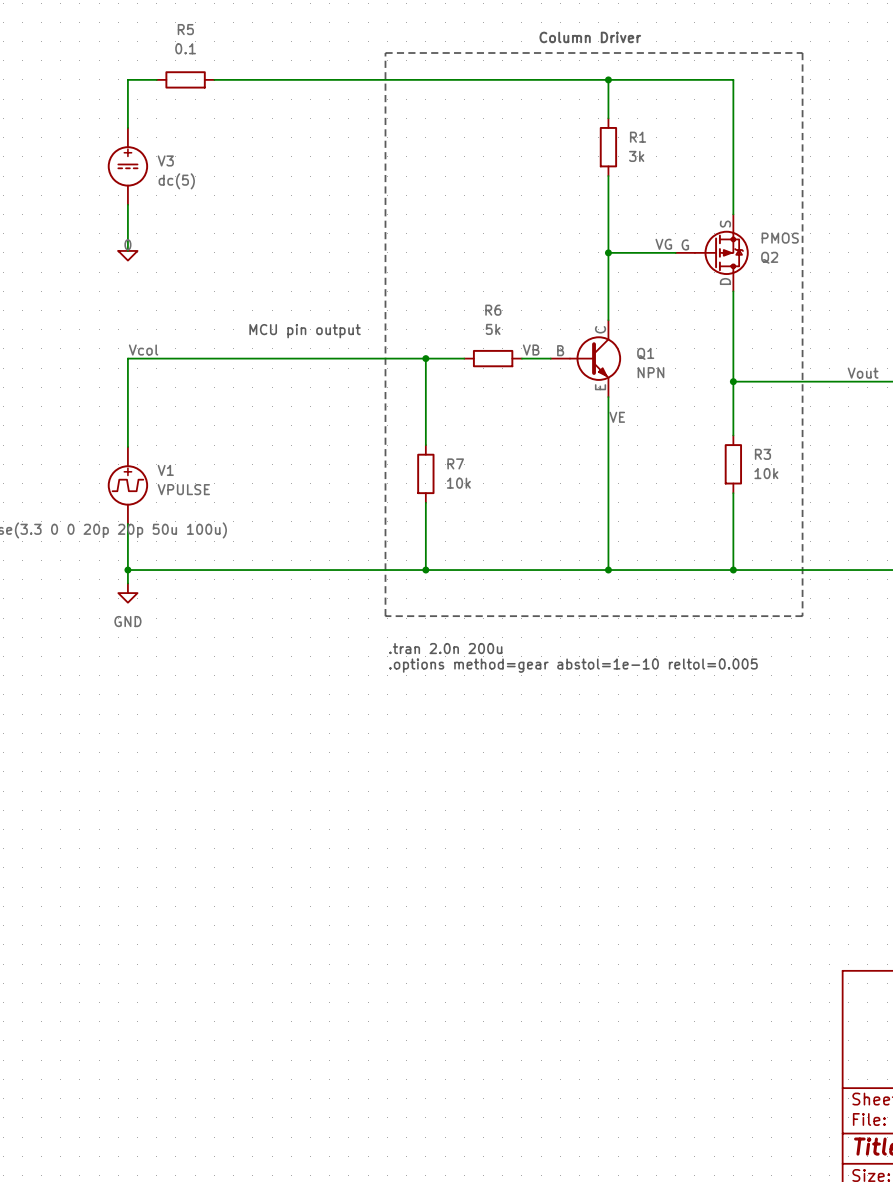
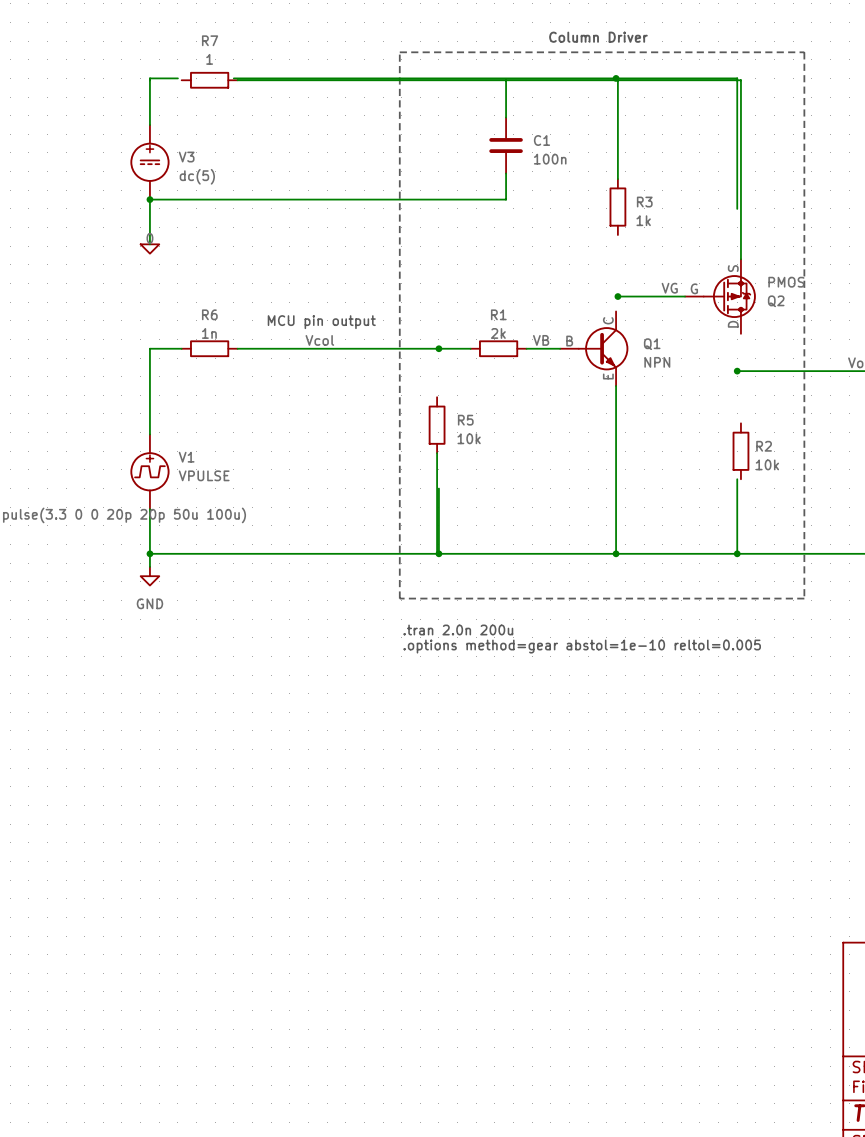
R5 name position: R5 (185, 29) -> R5 (465, 420)
R5 value: 0.1 (185, 48) -> 10k (469, 438)
R5 rotation: 0° (185, 79) -> 90° clockwise (437, 425)
R5 position: (185, 79) -> (437, 425)
wire: (608, 79) (608, 118) -> (506, 80) (506, 117)
wire: none -> (237, 80) (740, 80) (740, 259)
wire: none -> (617, 80) (617, 179)
R1 name position: R1 (638, 137) -> R1 (498, 314)
R1 rotation: 0° (608, 147) -> 90° clockwise (498, 348)
R1 position: (608, 147) -> (498, 348)
C1: none -> 100n (506, 145)
R1 value: 3k (636, 156) -> 2k (498, 333)
wire: (608, 176) (608, 320) -> none
wire: none -> (506, 173) (506, 199) (149, 199)
junction: none -> (149, 199)
label position: VG (663, 244) -> VG (669, 288)
wire: (608, 252) (675, 252) -> none
junction: (608, 252) -> none
Q2 position: (712, 252) -> (720, 296)
wire: (733, 291) (733, 435) -> none
wire: none -> (617, 296) (685, 296)
junction: none -> (617, 296)
R6 name position: R6 (493, 310) -> R6 (209, 314)
R6 value: 5k (493, 329) -> 1n (209, 333)
label position: Vcol (143, 350) -> Vcol (319, 340)
wire: (160, 358) (218, 358) -> none
wire: (425, 358) (425, 445) -> none
R6 position: (493, 358) -> (209, 348)
label: VE (617, 417) -> none
R3 name position: R3 (762, 454) -> R3 (644, 202)
R7 name position: R7 (455, 463) -> R7 (210, 40)
R3 position: (733, 464) -> (617, 207)
R2: none -> 10k (740, 451)
wire: none -> (437, 453) (437, 553)
R7 rotation: 0° (425, 473) -> 90° clockwise (209, 80)
R7 position: (425, 473) -> (209, 80)
R3 value: 10k (766, 473) -> 1k (643, 220)
R7 value: 10k (458, 483) -> 1 (209, 59)

